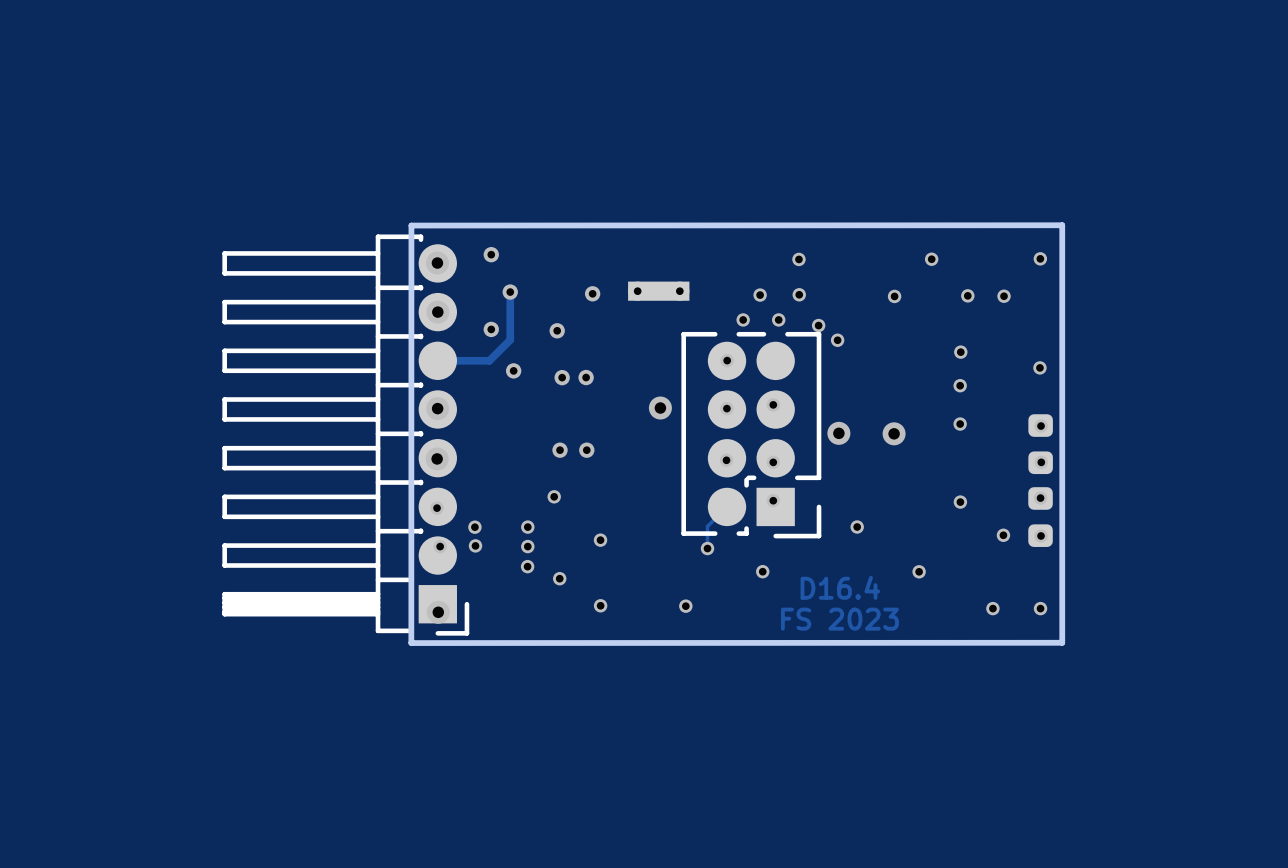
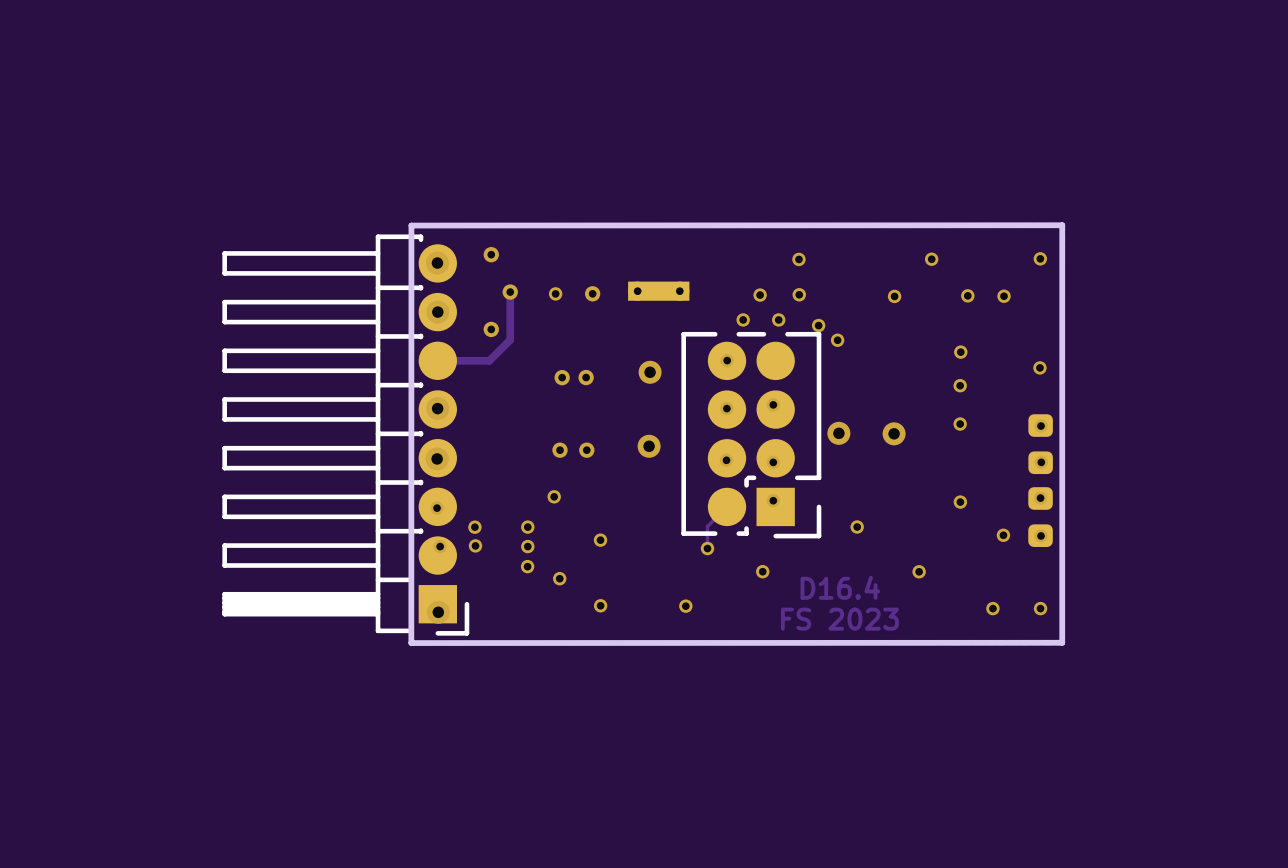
via: none -> (555, 293)
via: (557, 330) -> none
via: (513, 370) -> none
via: none -> (650, 372)
via: (660, 408) -> none
via: none -> (649, 446)

